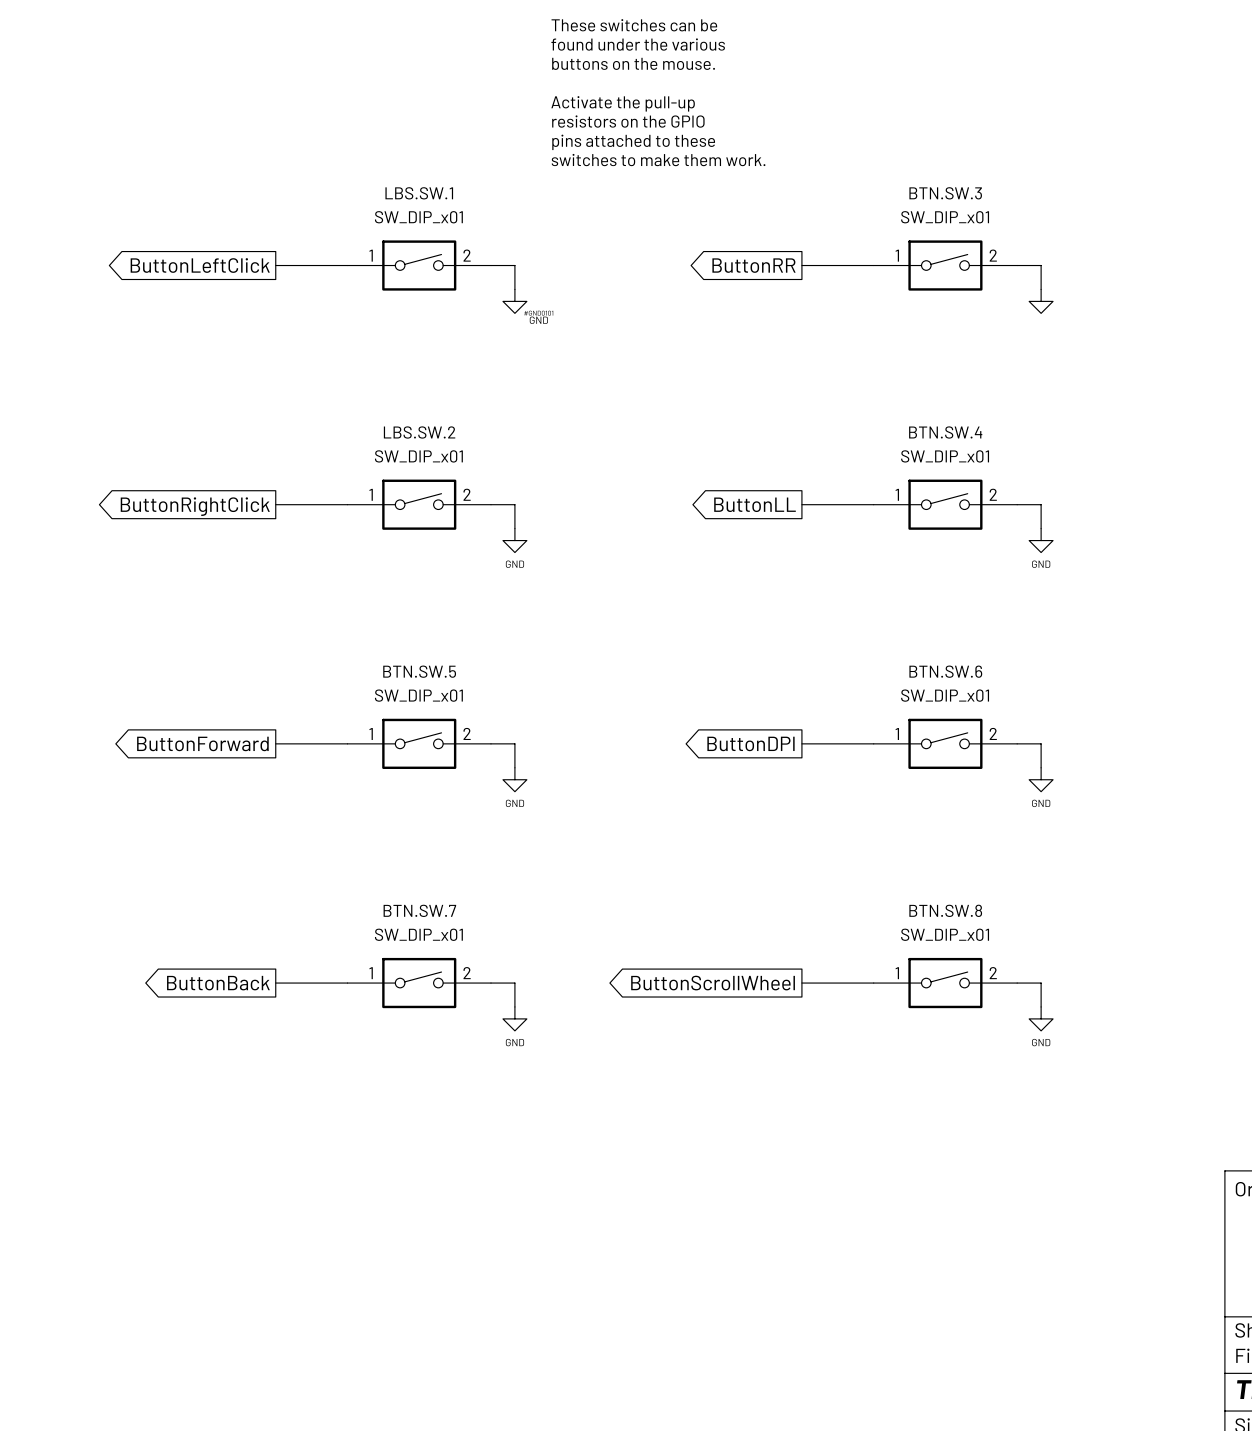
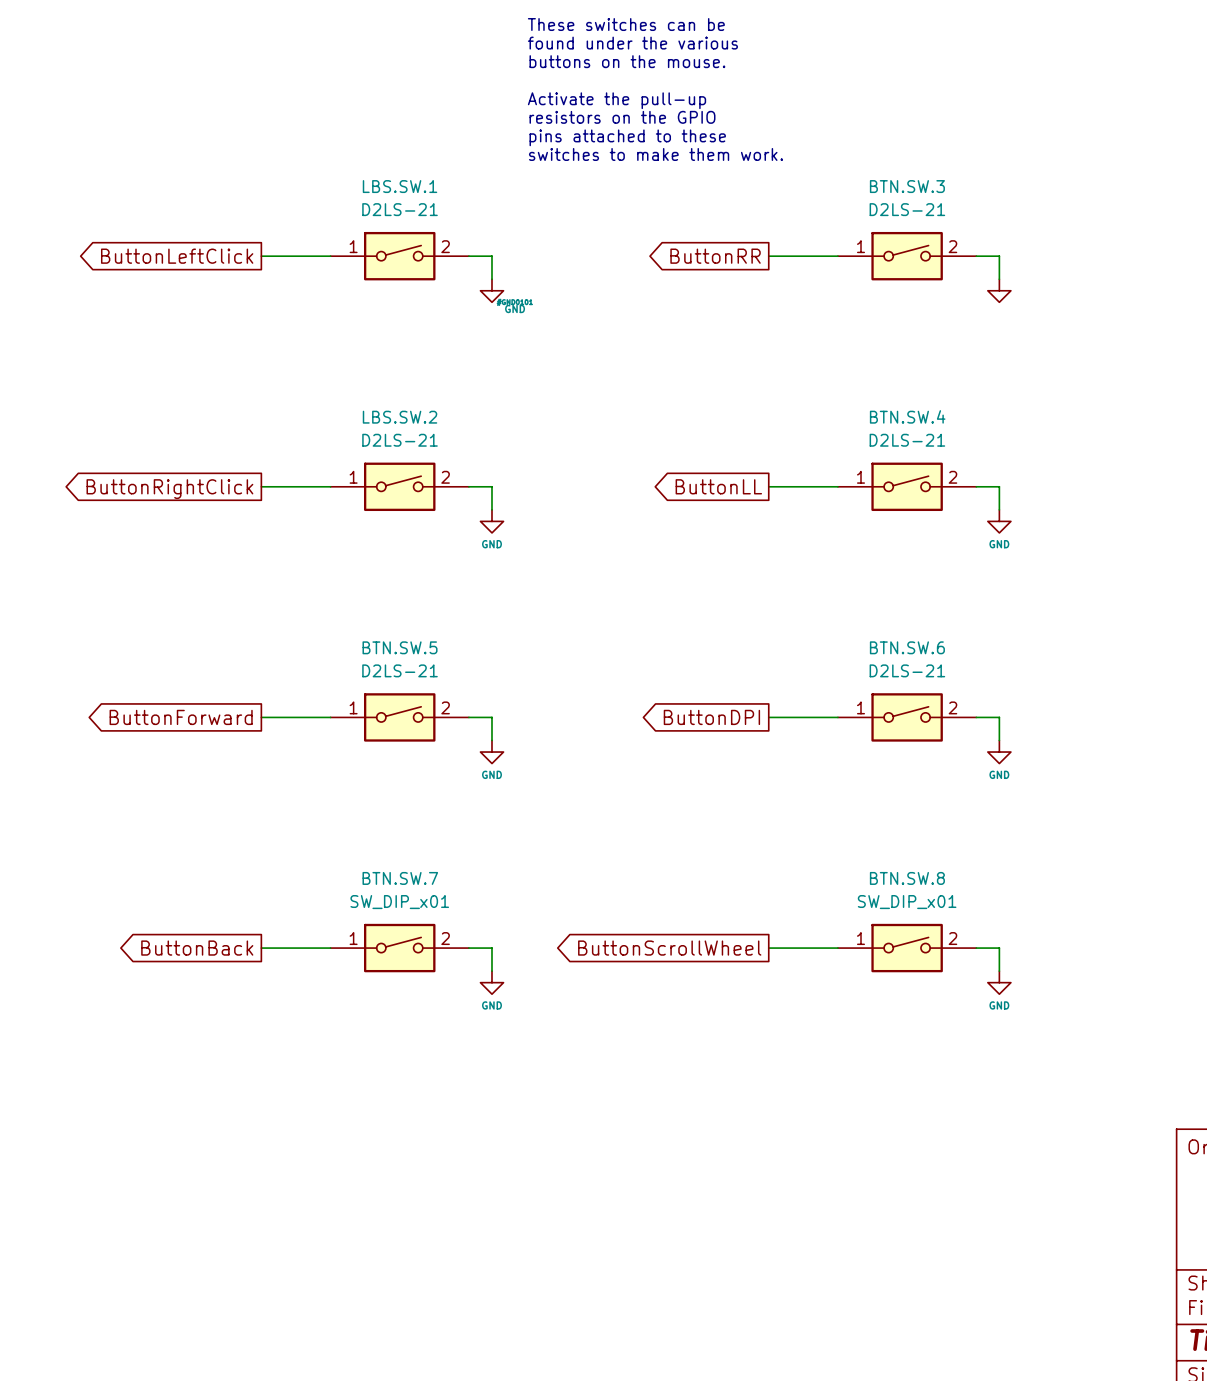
LBS.SW.1 value: SW_DIP_x01 (418, 217) -> D2LS-21 (400, 209)
BTN.SW.3 value: SW_DIP_x01 (945, 217) -> D2LS-21 (907, 209)
LBS.SW.2 value: SW_DIP_x01 (418, 456) -> D2LS-21 (400, 440)
BTN.SW.4 value: SW_DIP_x01 (945, 456) -> D2LS-21 (907, 440)
BTN.SW.5 value: SW_DIP_x01 (418, 695) -> D2LS-21 (400, 670)
BTN.SW.6 value: SW_DIP_x01 (945, 695) -> D2LS-21 (907, 670)

